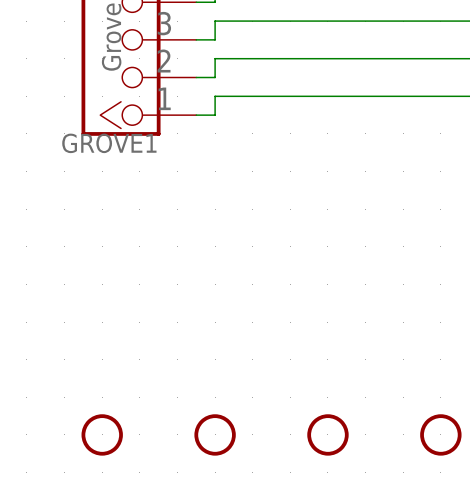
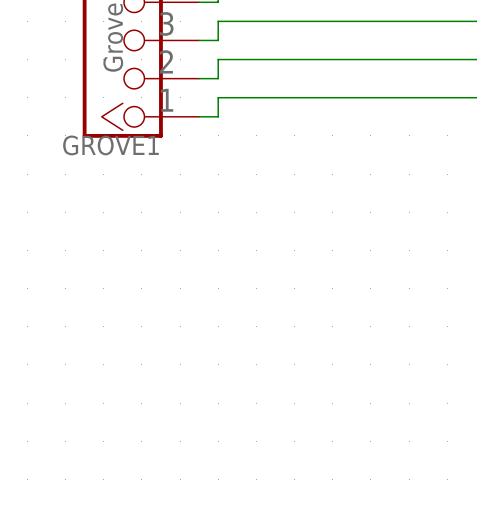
part: (102, 434) -> none
part: (215, 434) -> none
part: (327, 434) -> none
part: (440, 434) -> none

